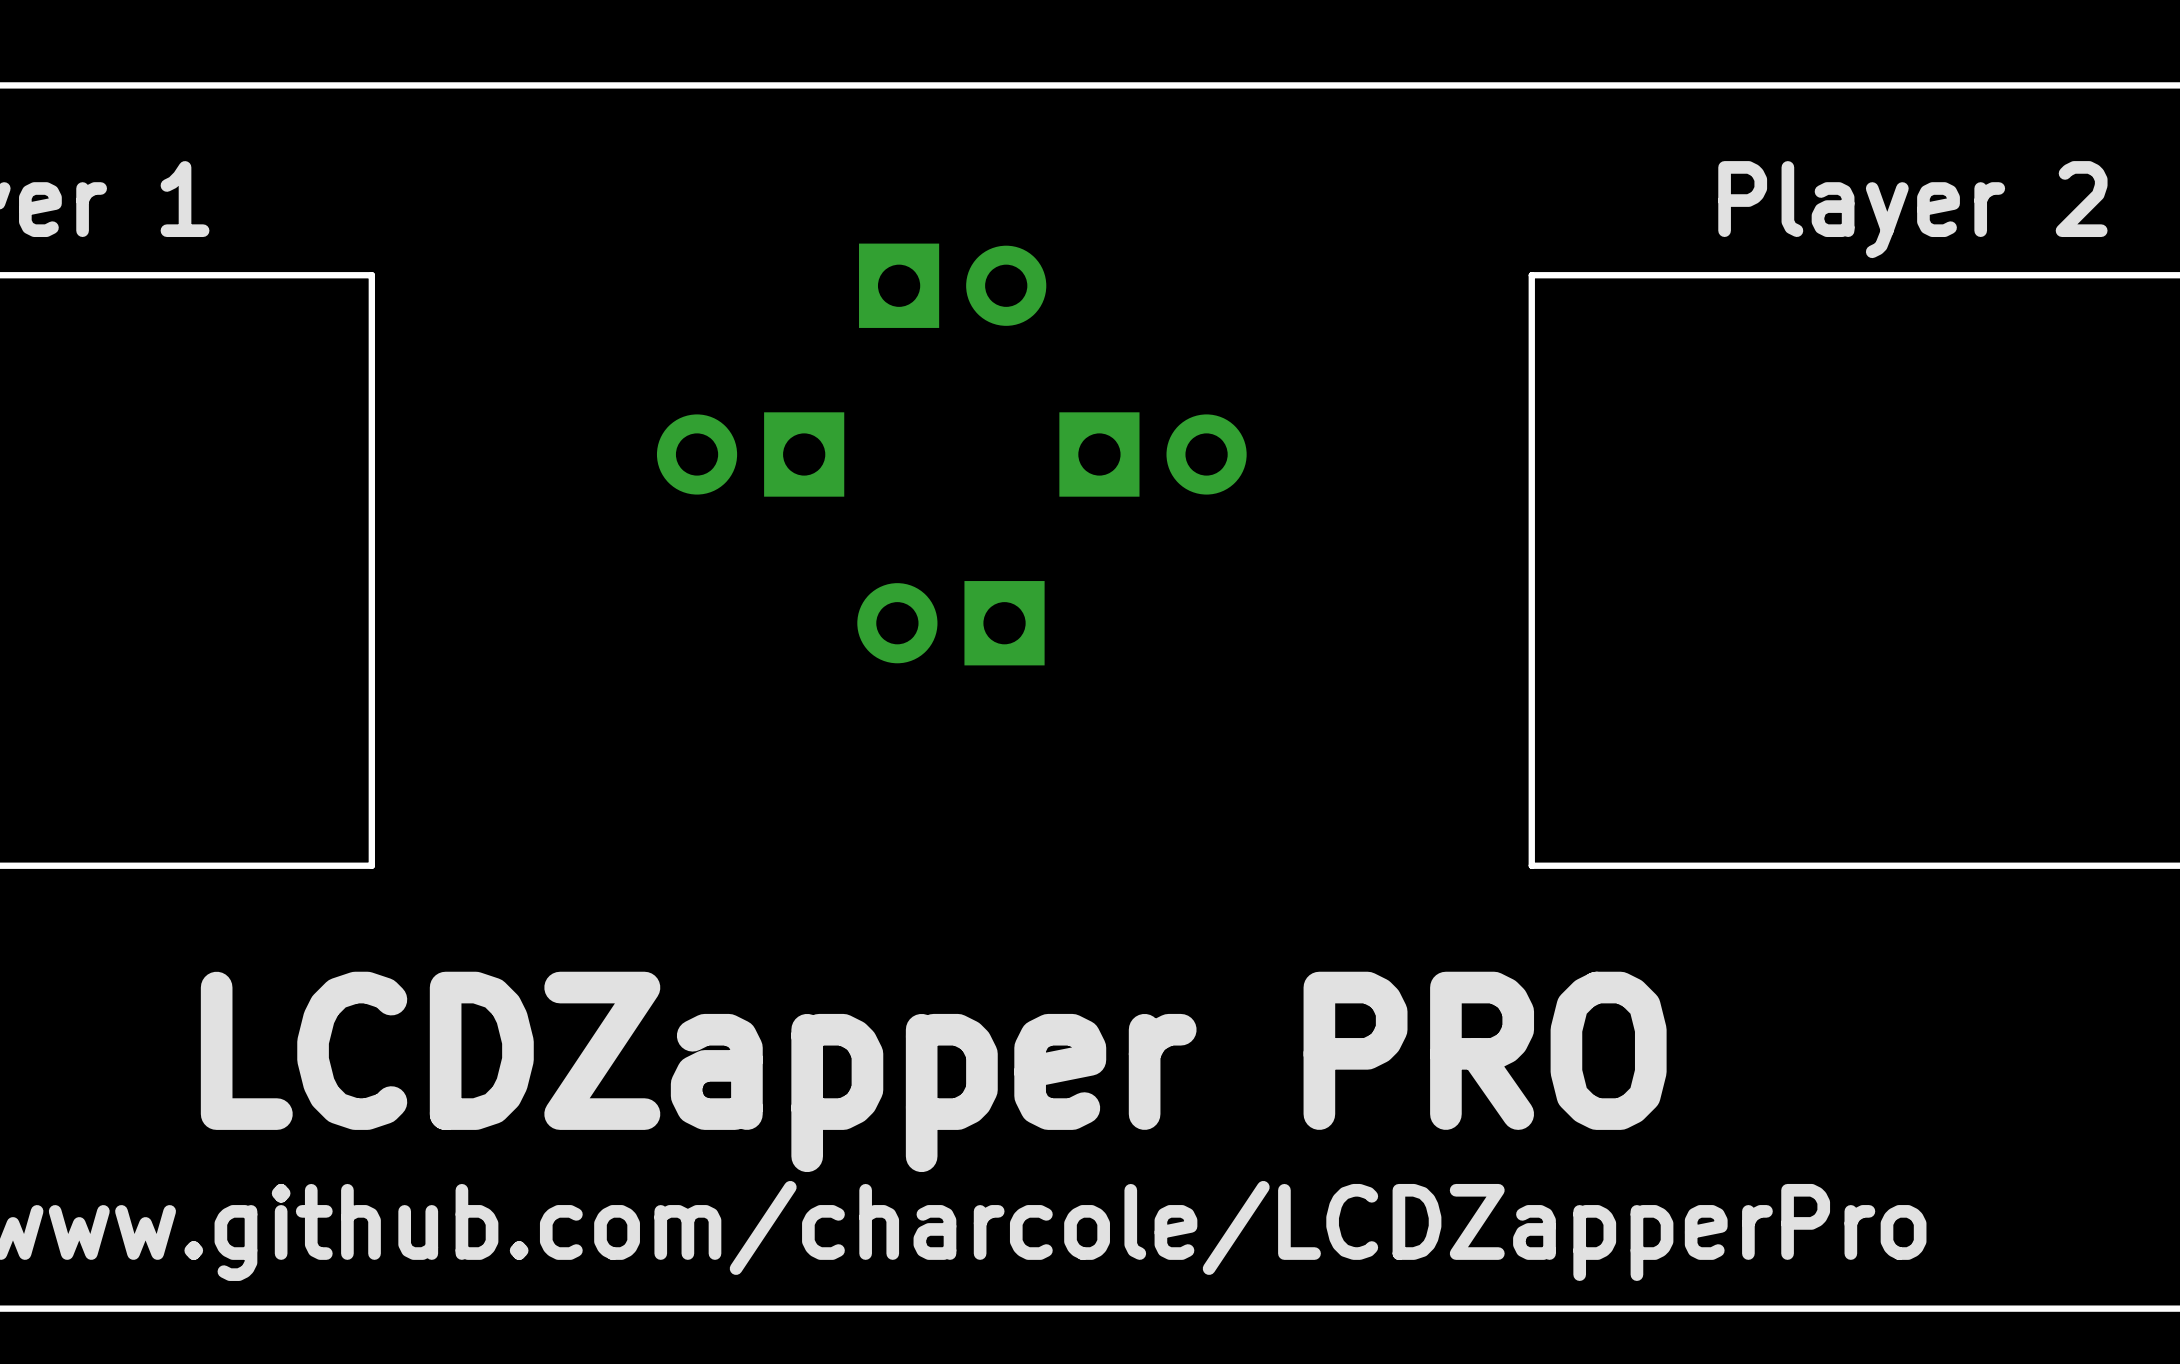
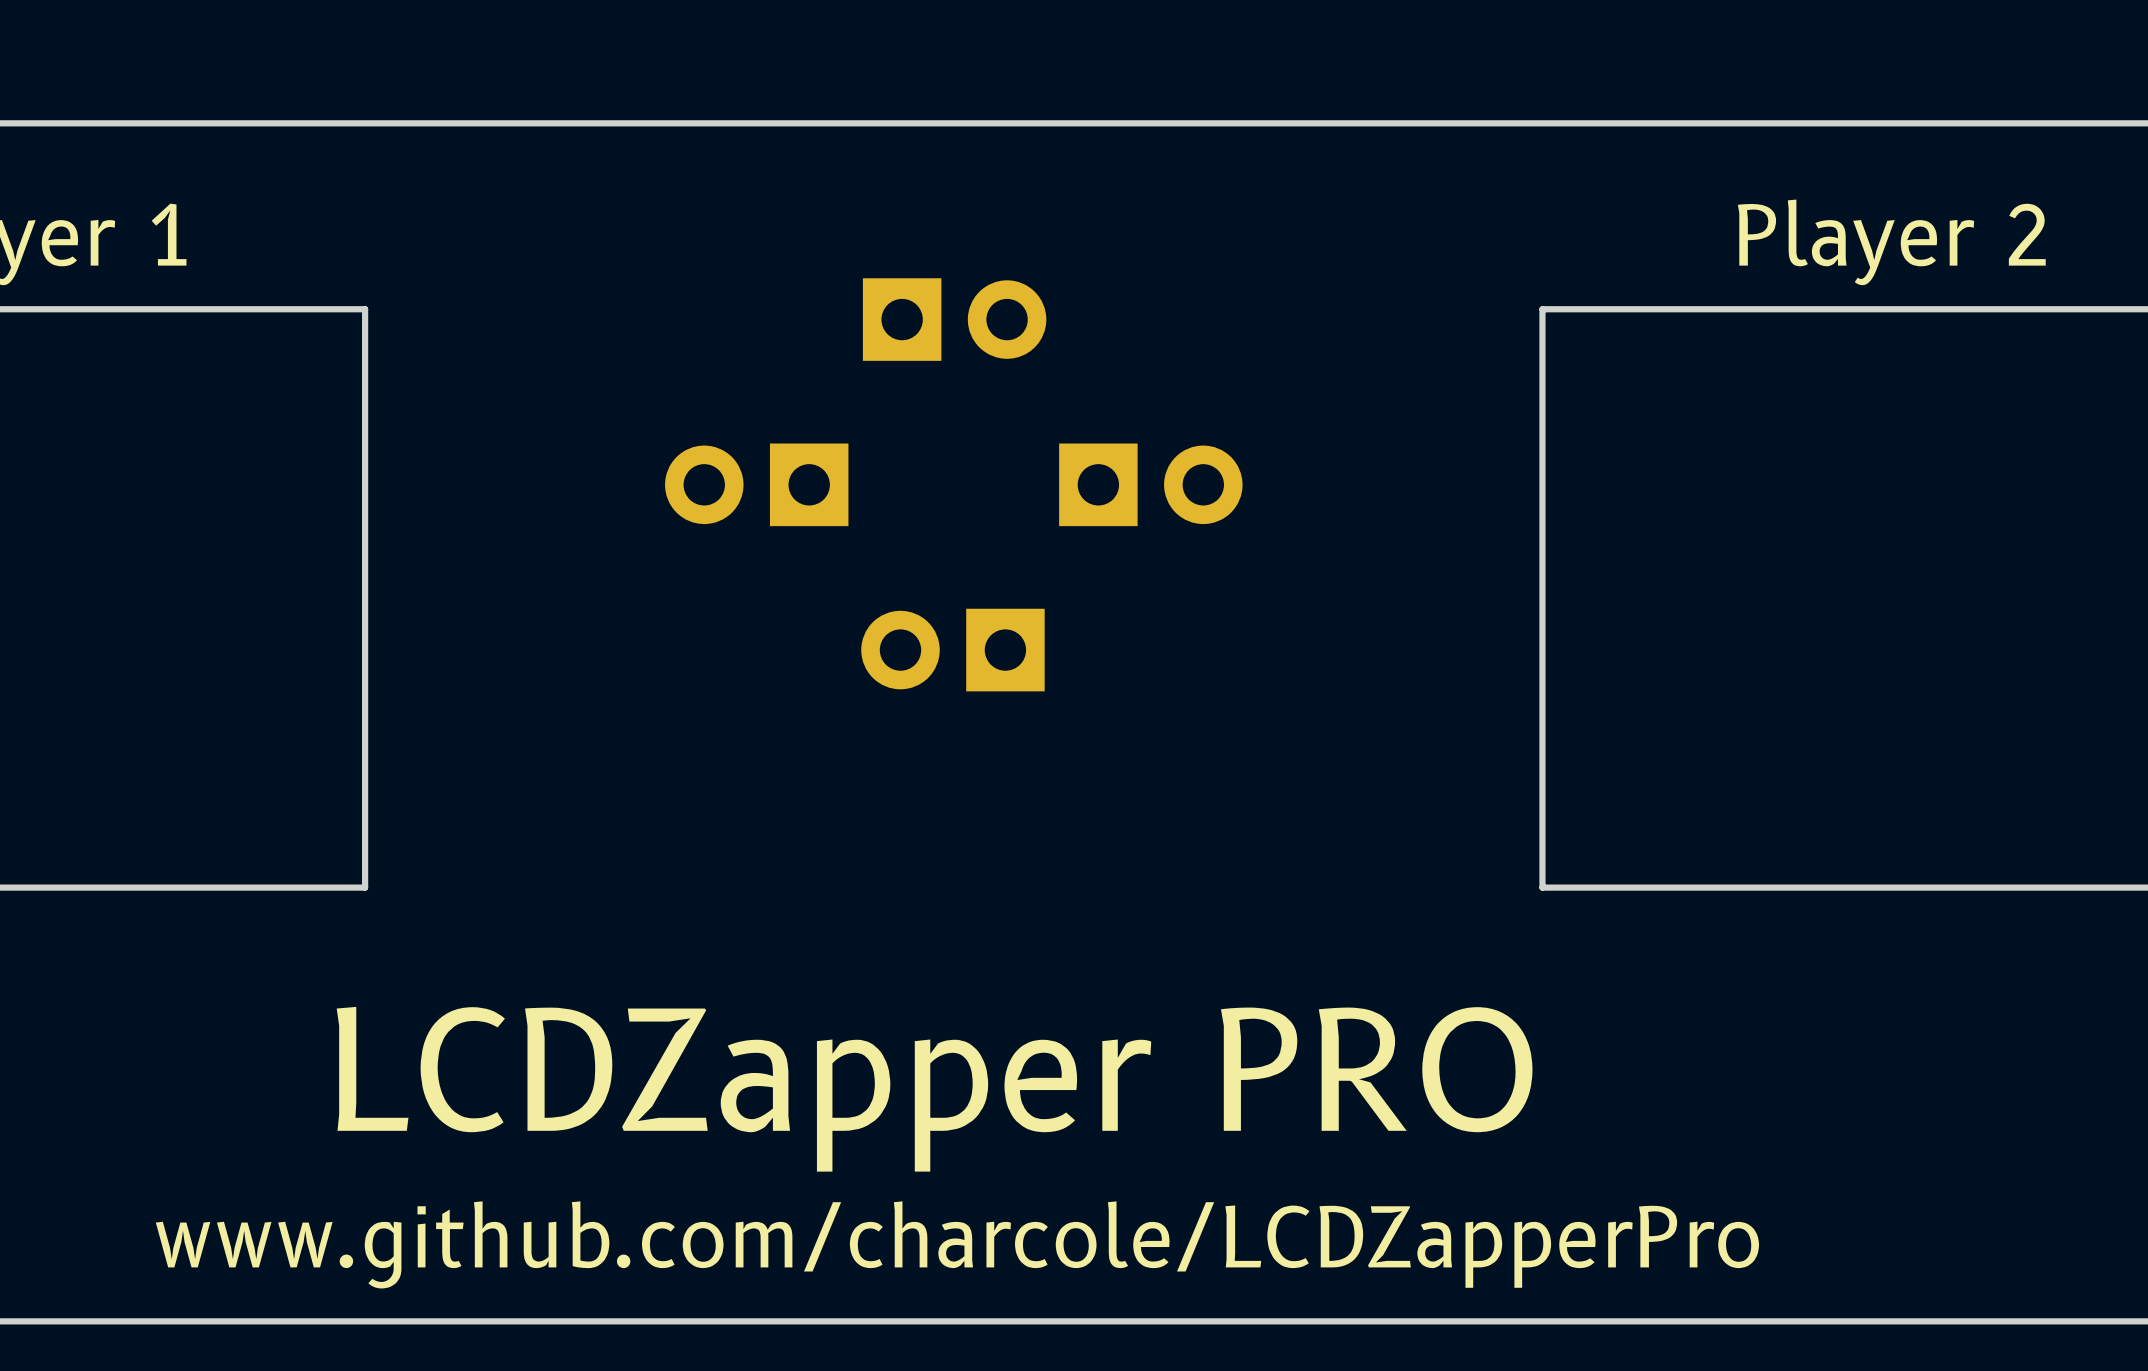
board edge: (350, 275) (371, 275) (371, 865) (350, 865) -> (365, 309) (365, 887)
board edge: (1552, 275) (1531, 275) (1531, 865) (1552, 865) -> (1542, 309) (1542, 887)

